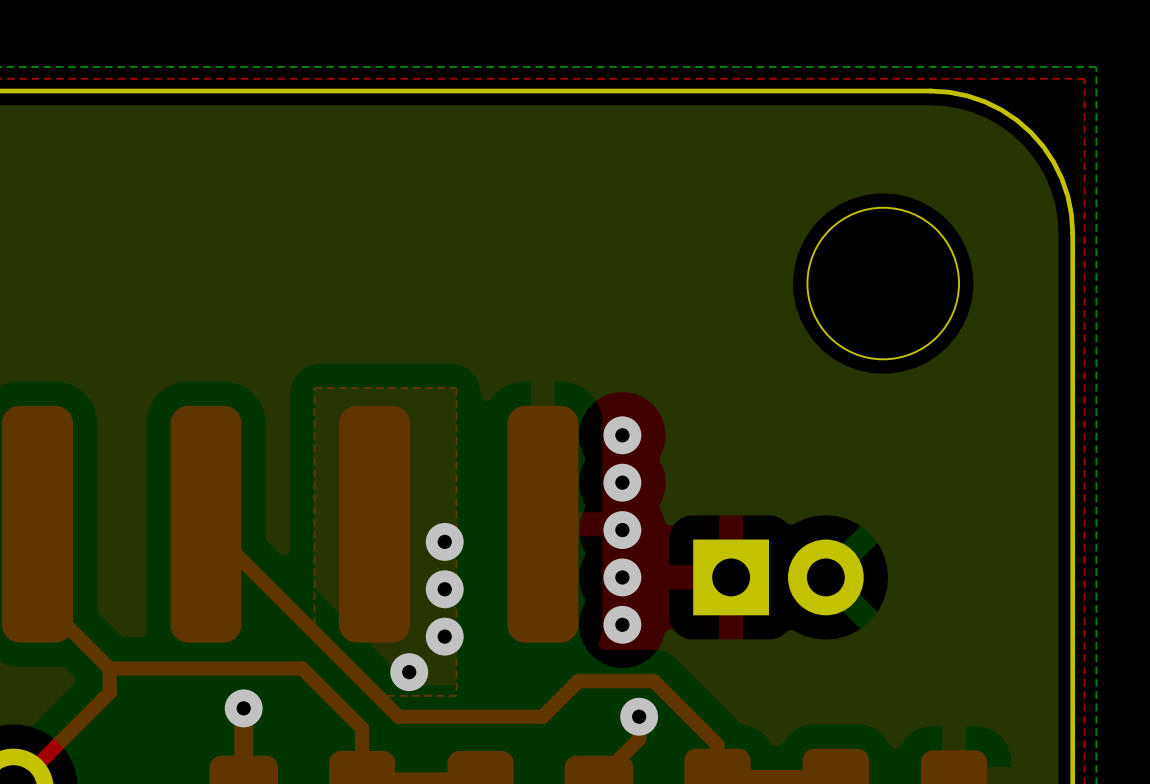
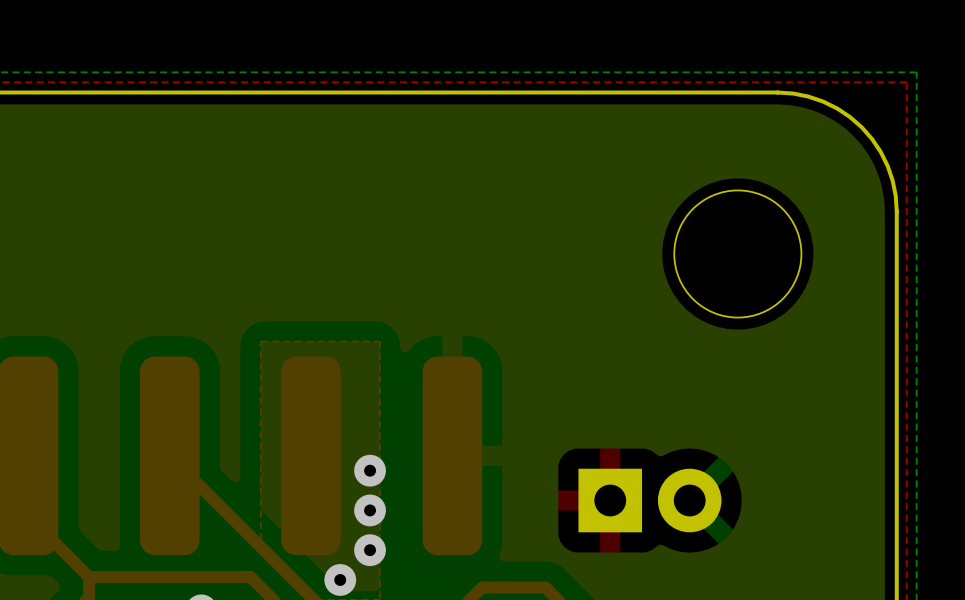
via: (622, 435) -> none
via: (622, 482) -> none
via: (622, 530) -> none
via: (622, 577) -> none
via: (622, 624) -> none

